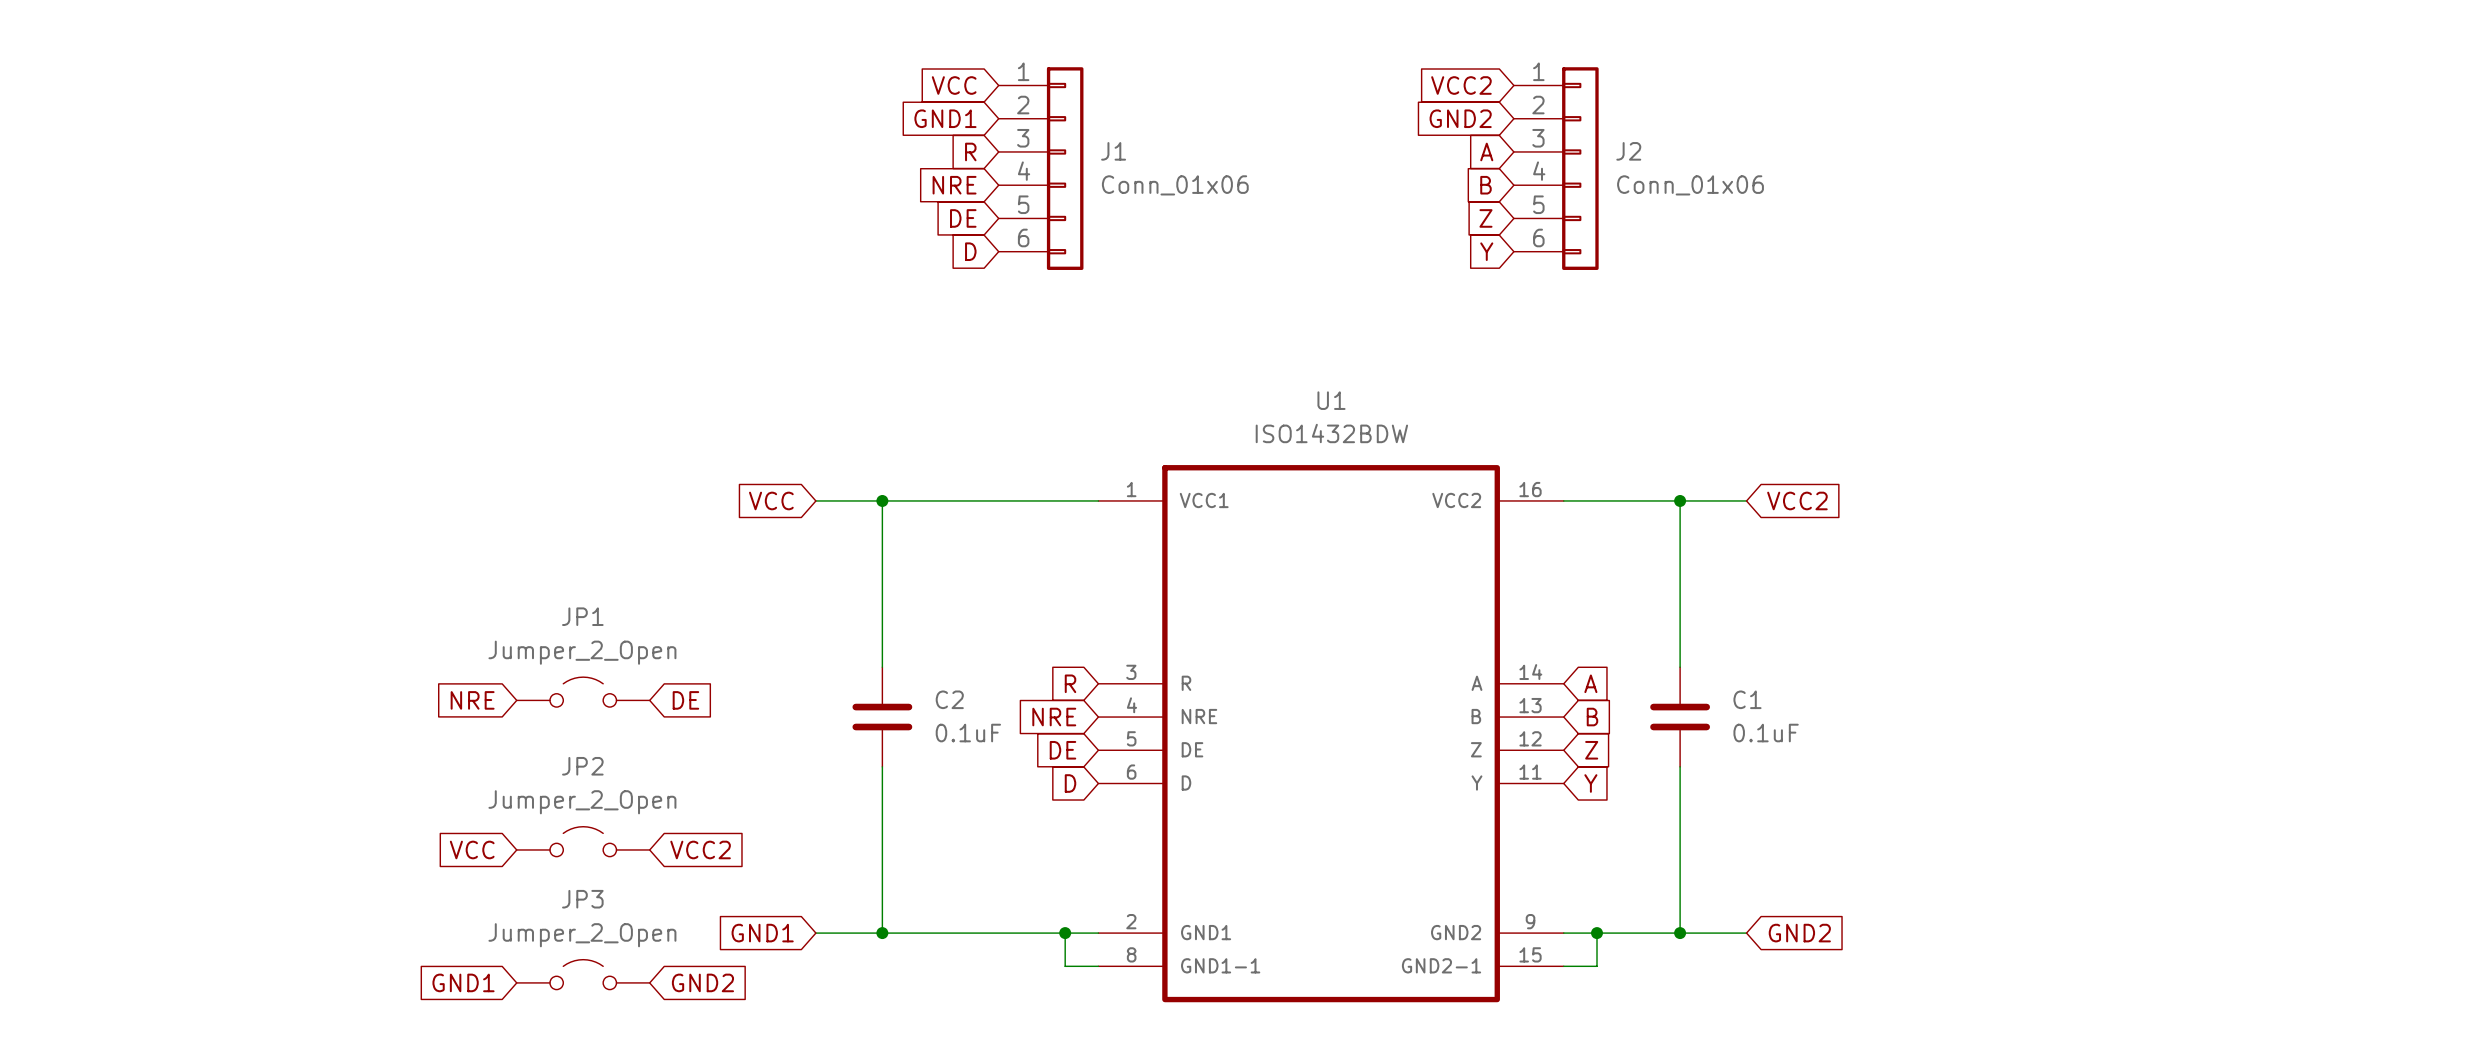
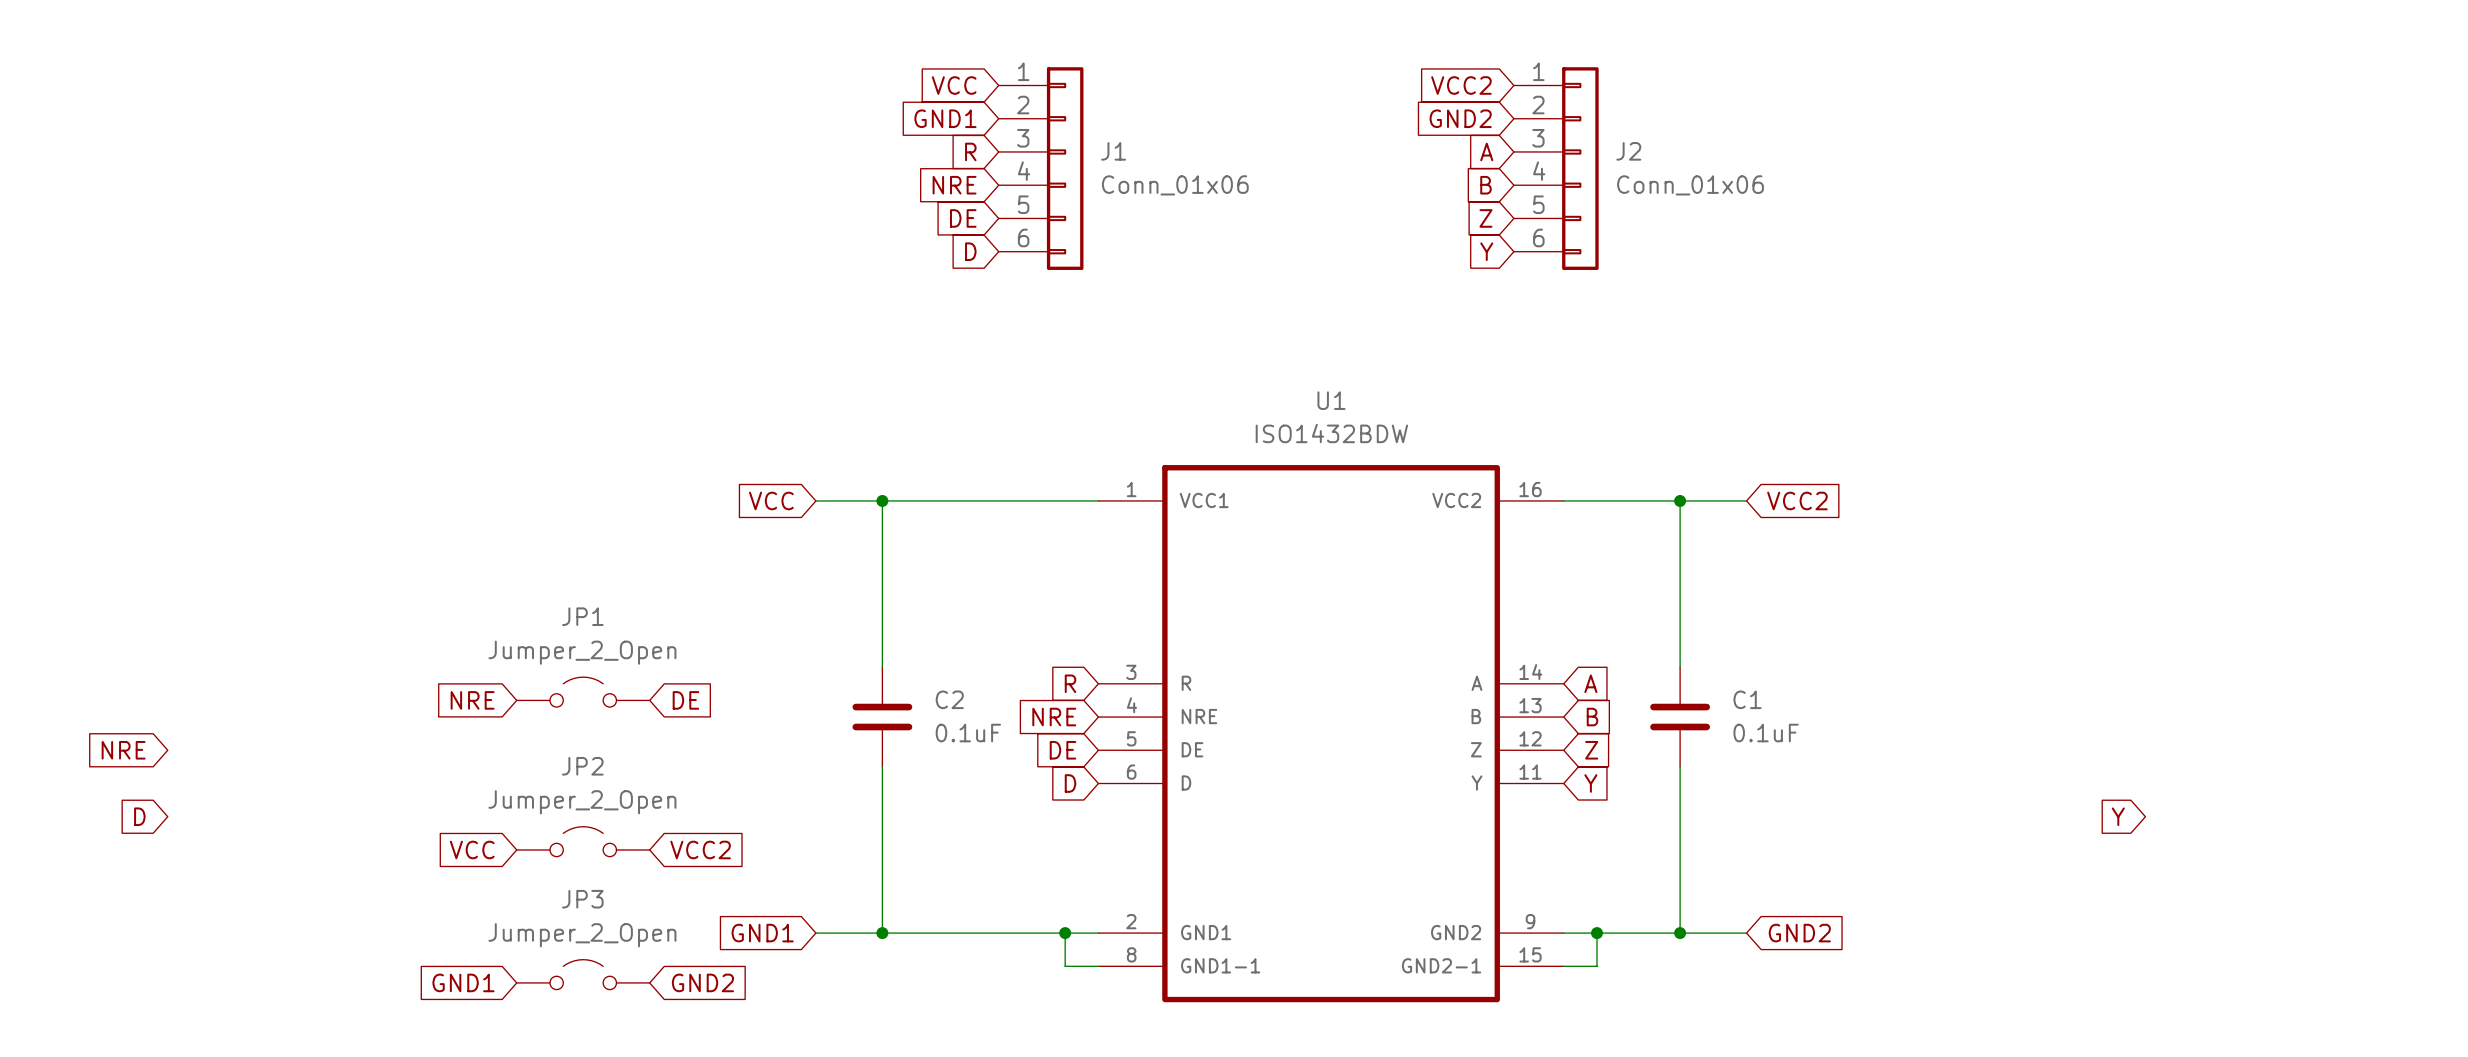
global label: none -> NRE (123, 750)
global label: none -> D (139, 816)
global label: none -> Y (2118, 816)

